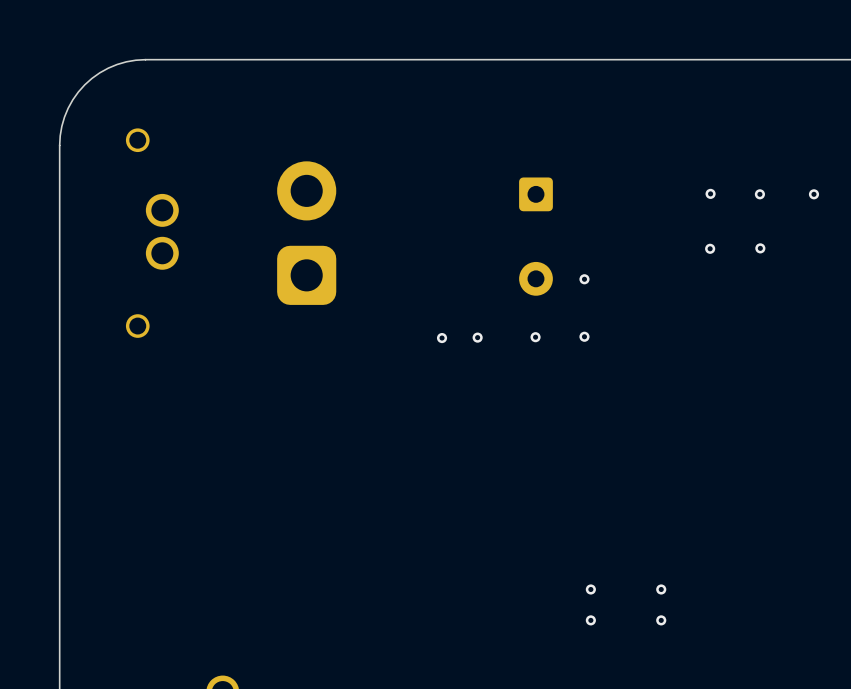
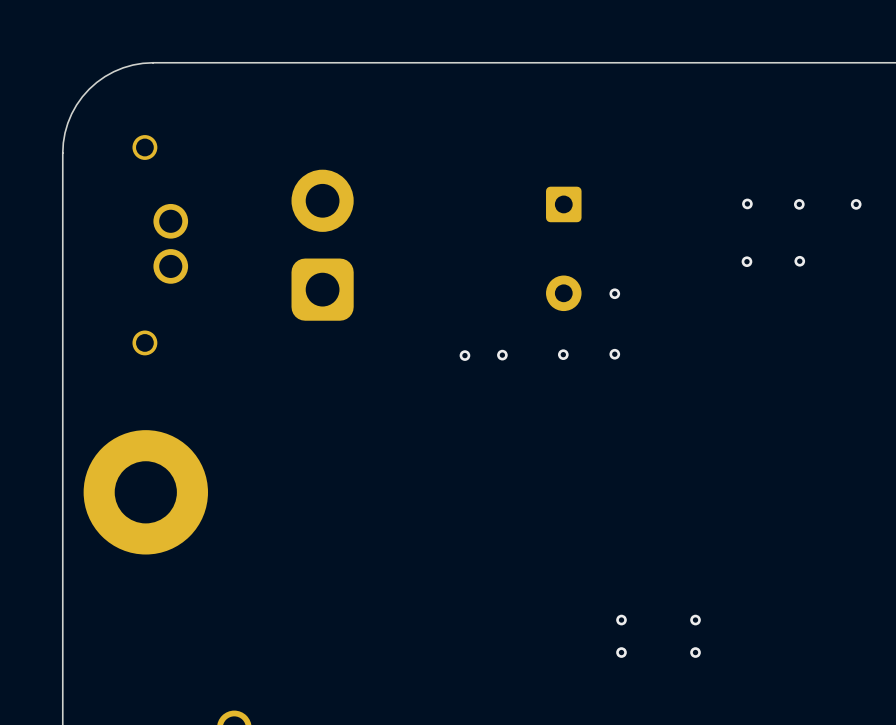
part: none -> (145, 492)

